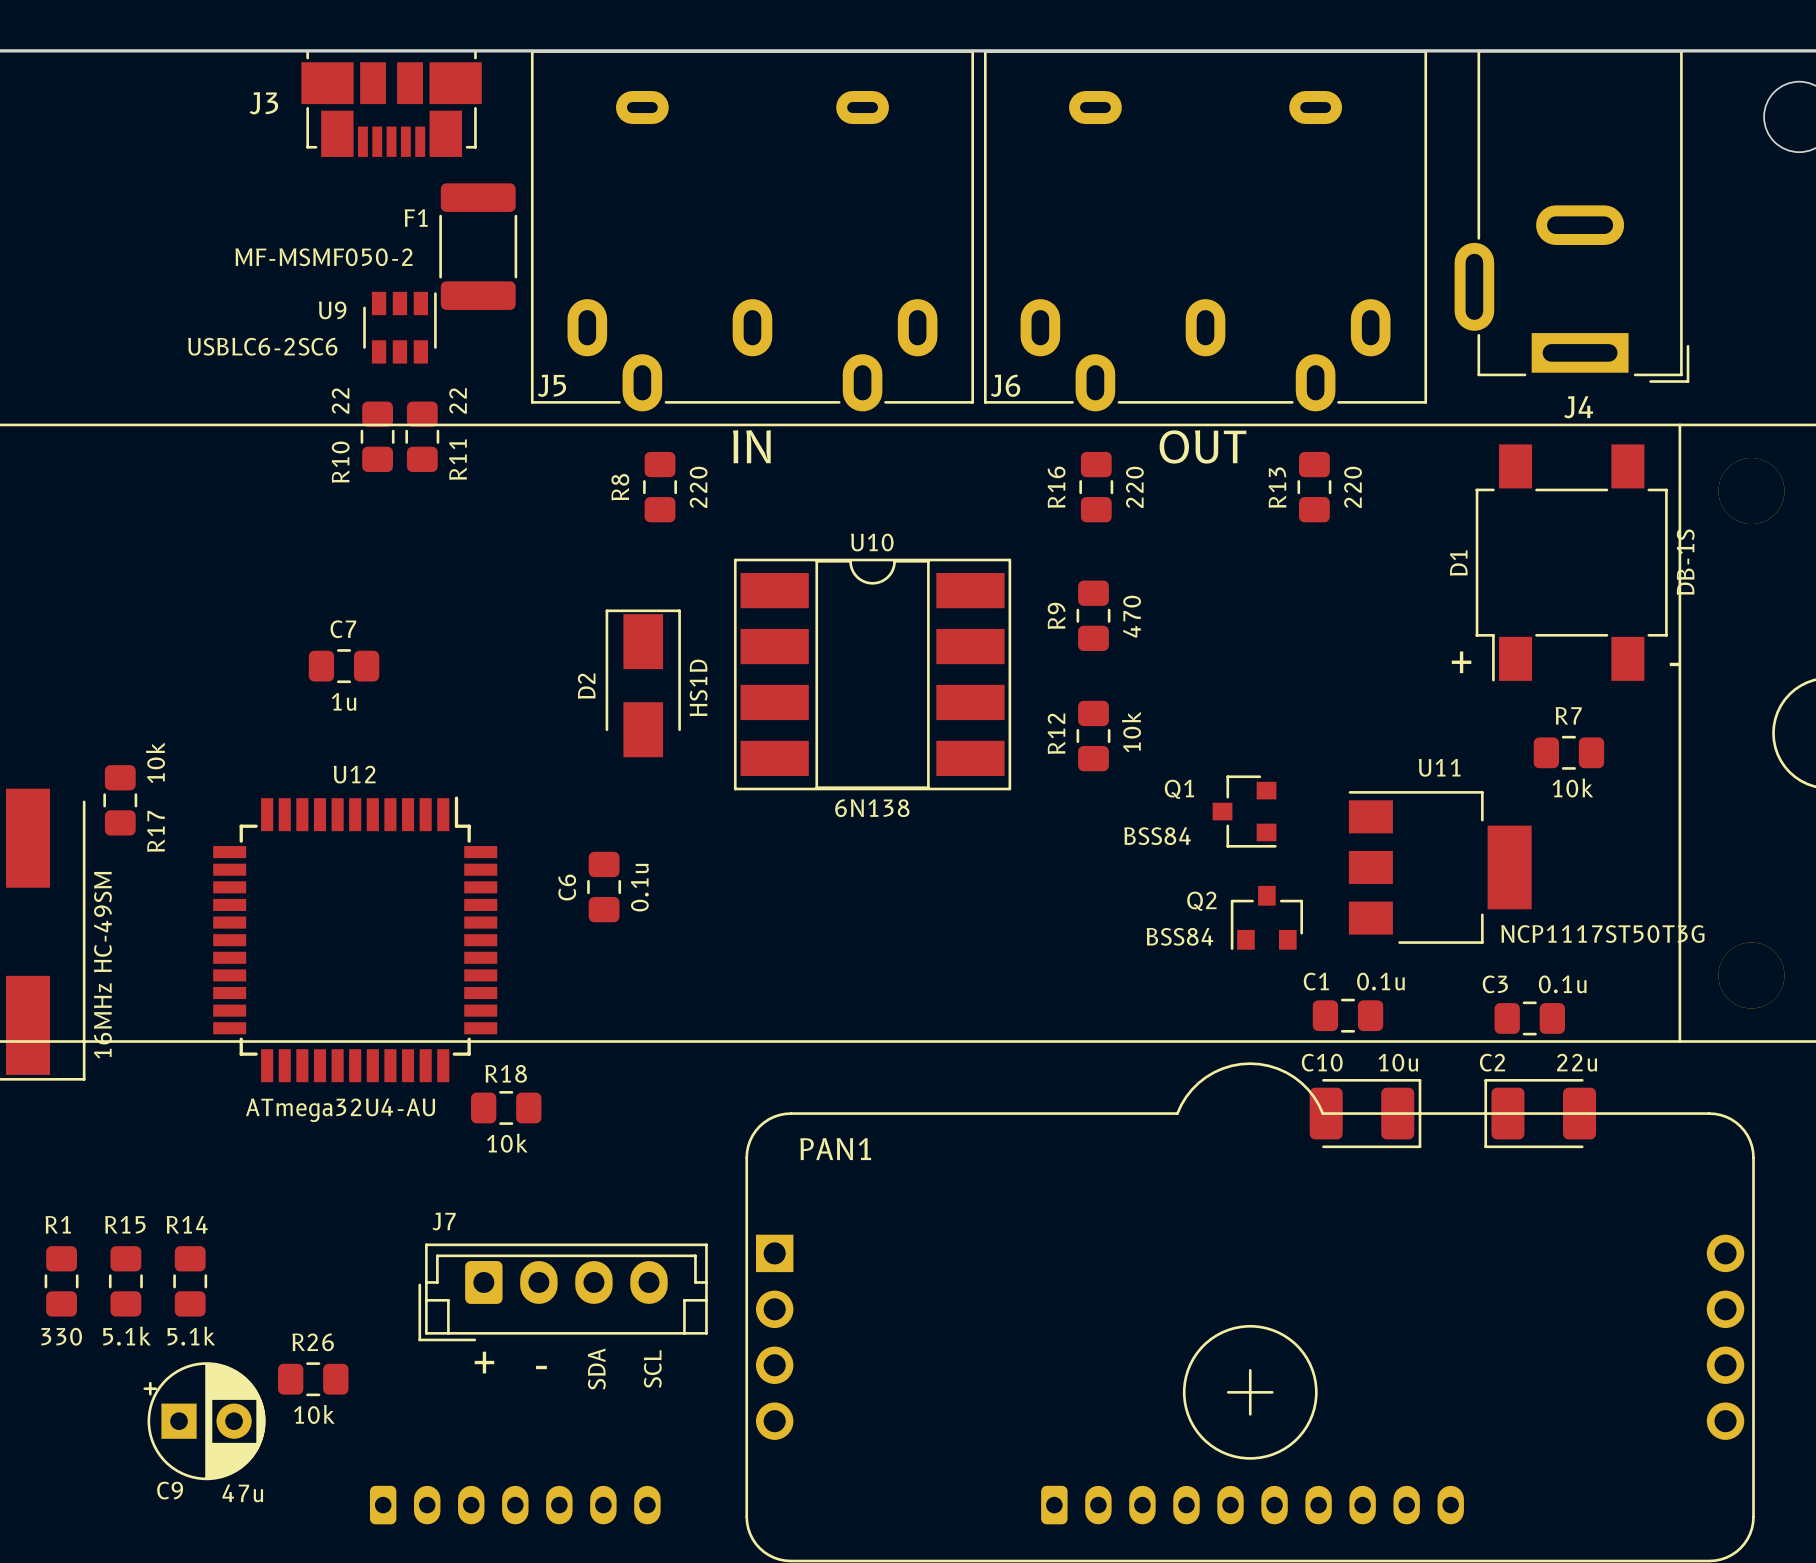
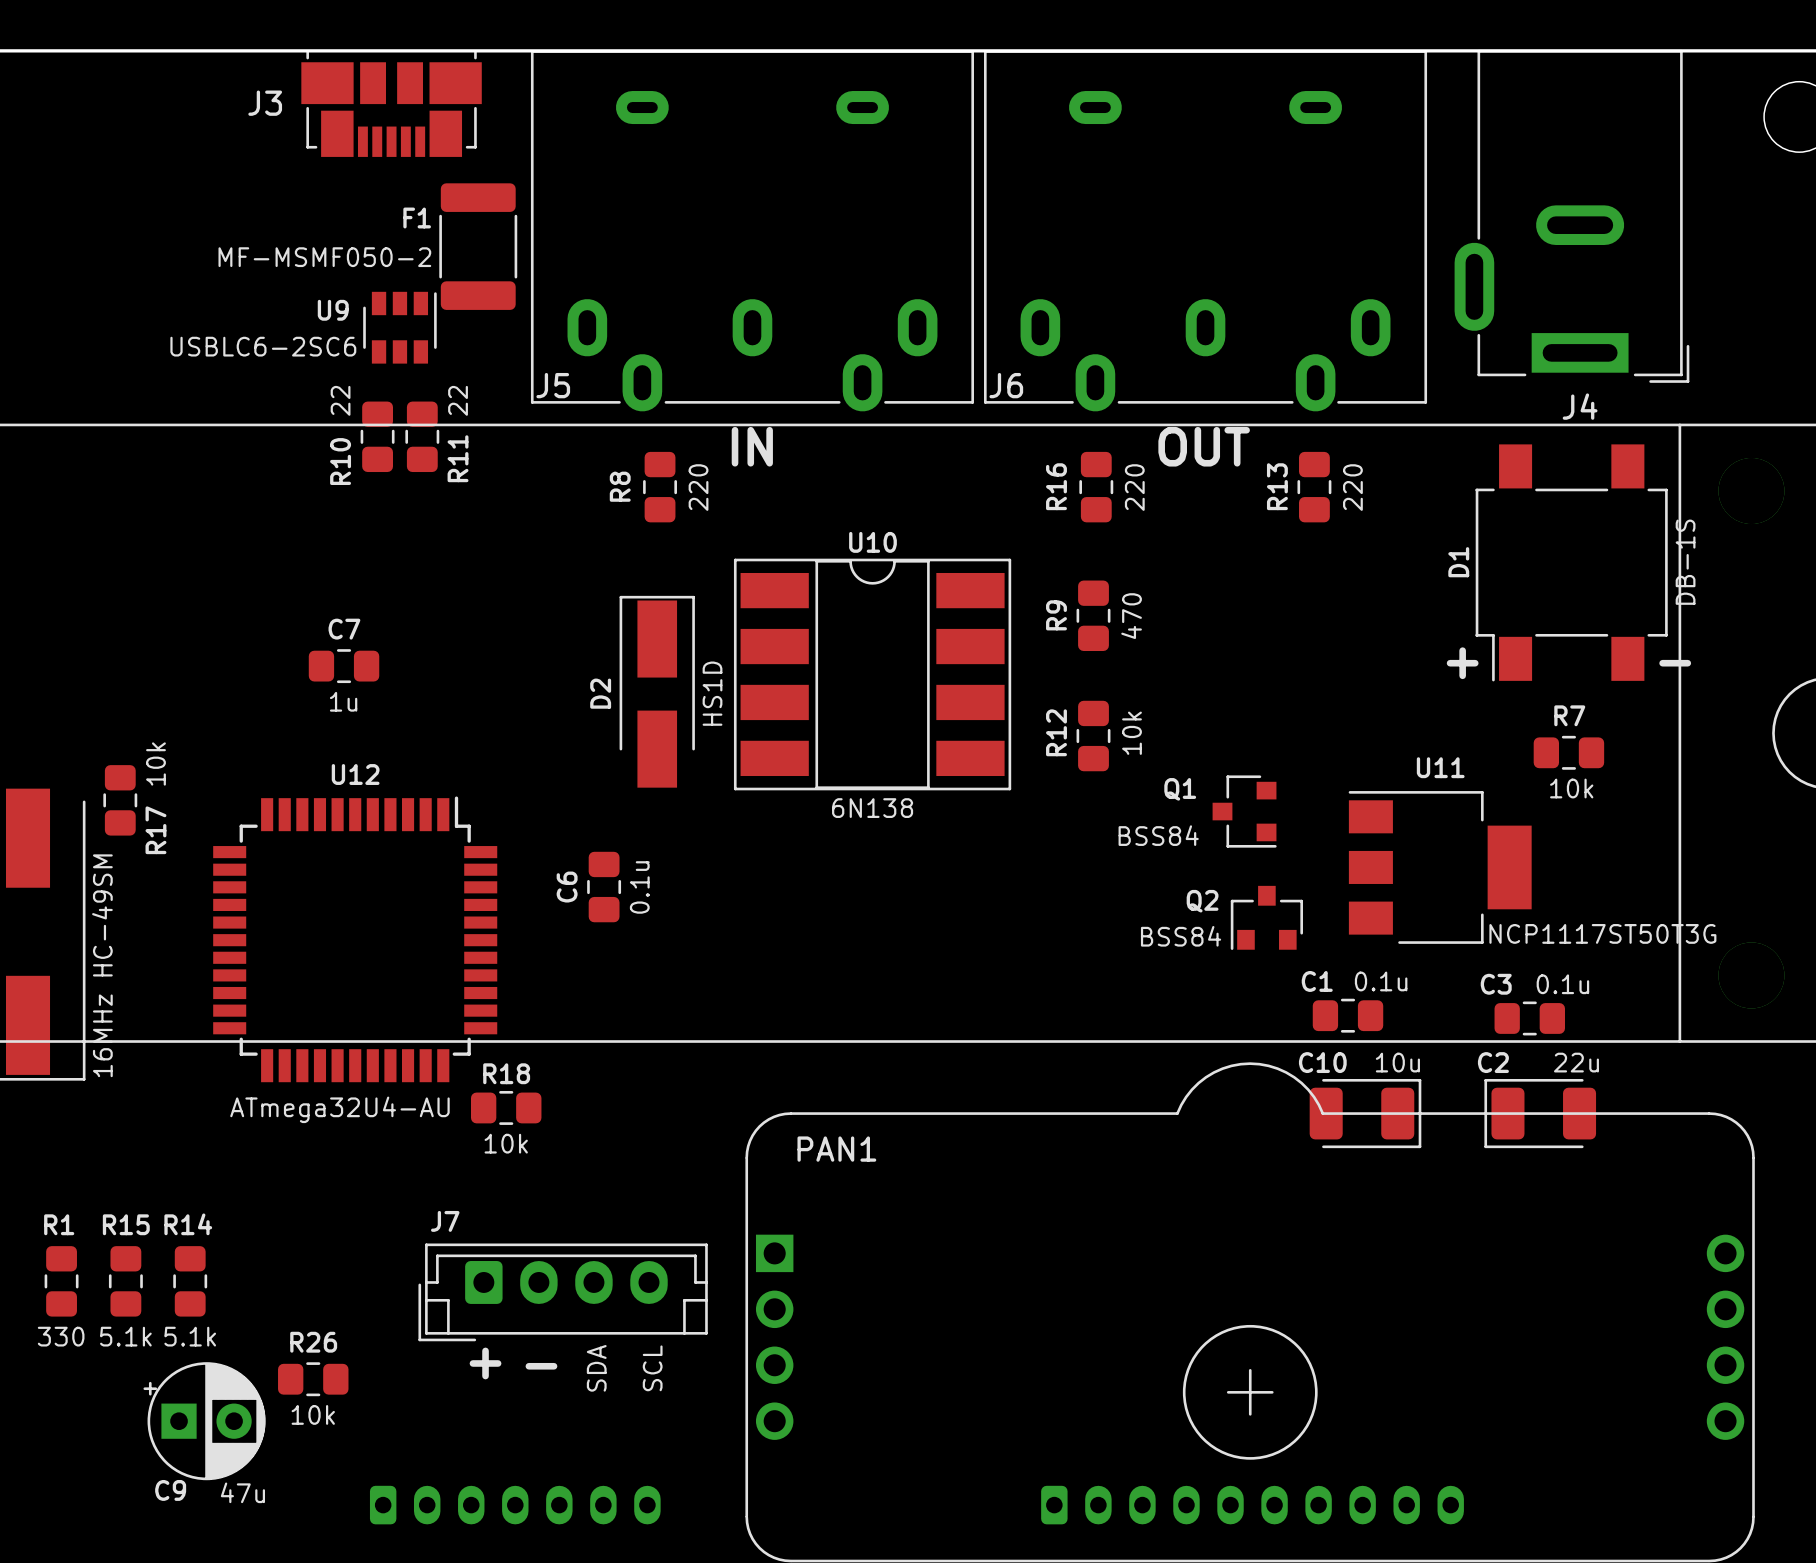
D2 footprint: [605, 609, 681, 758] -> [619, 595, 695, 788]

